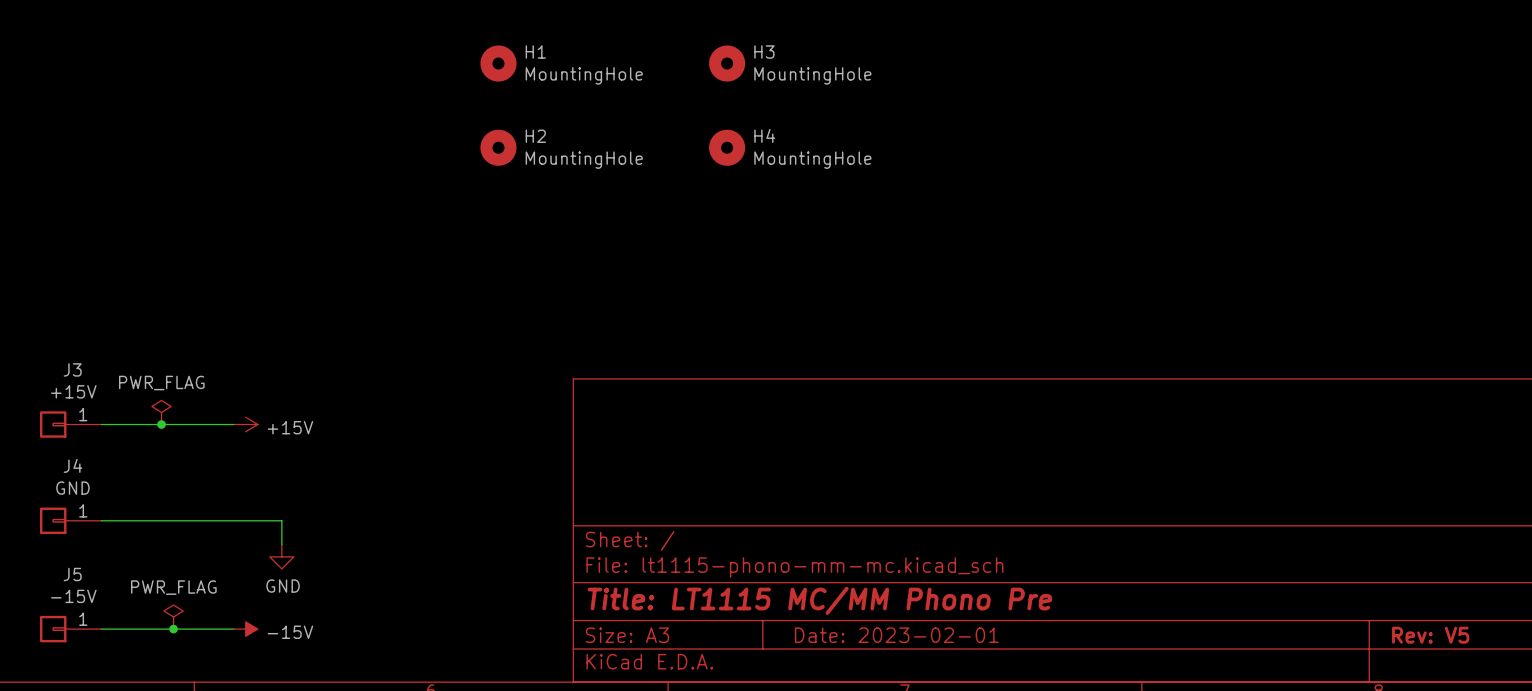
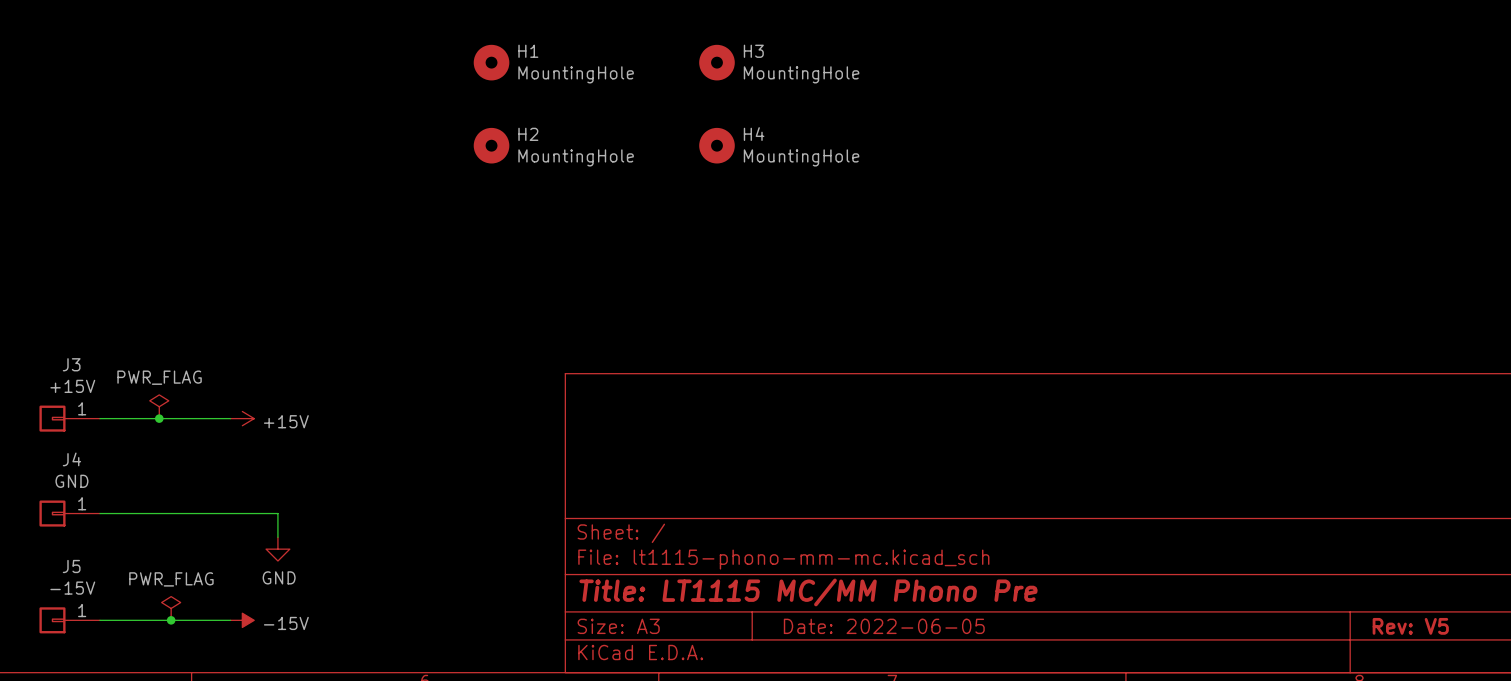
title block: Date: 2023-02-01 (896, 635) -> Date: 2022-06-05 (884, 626)

